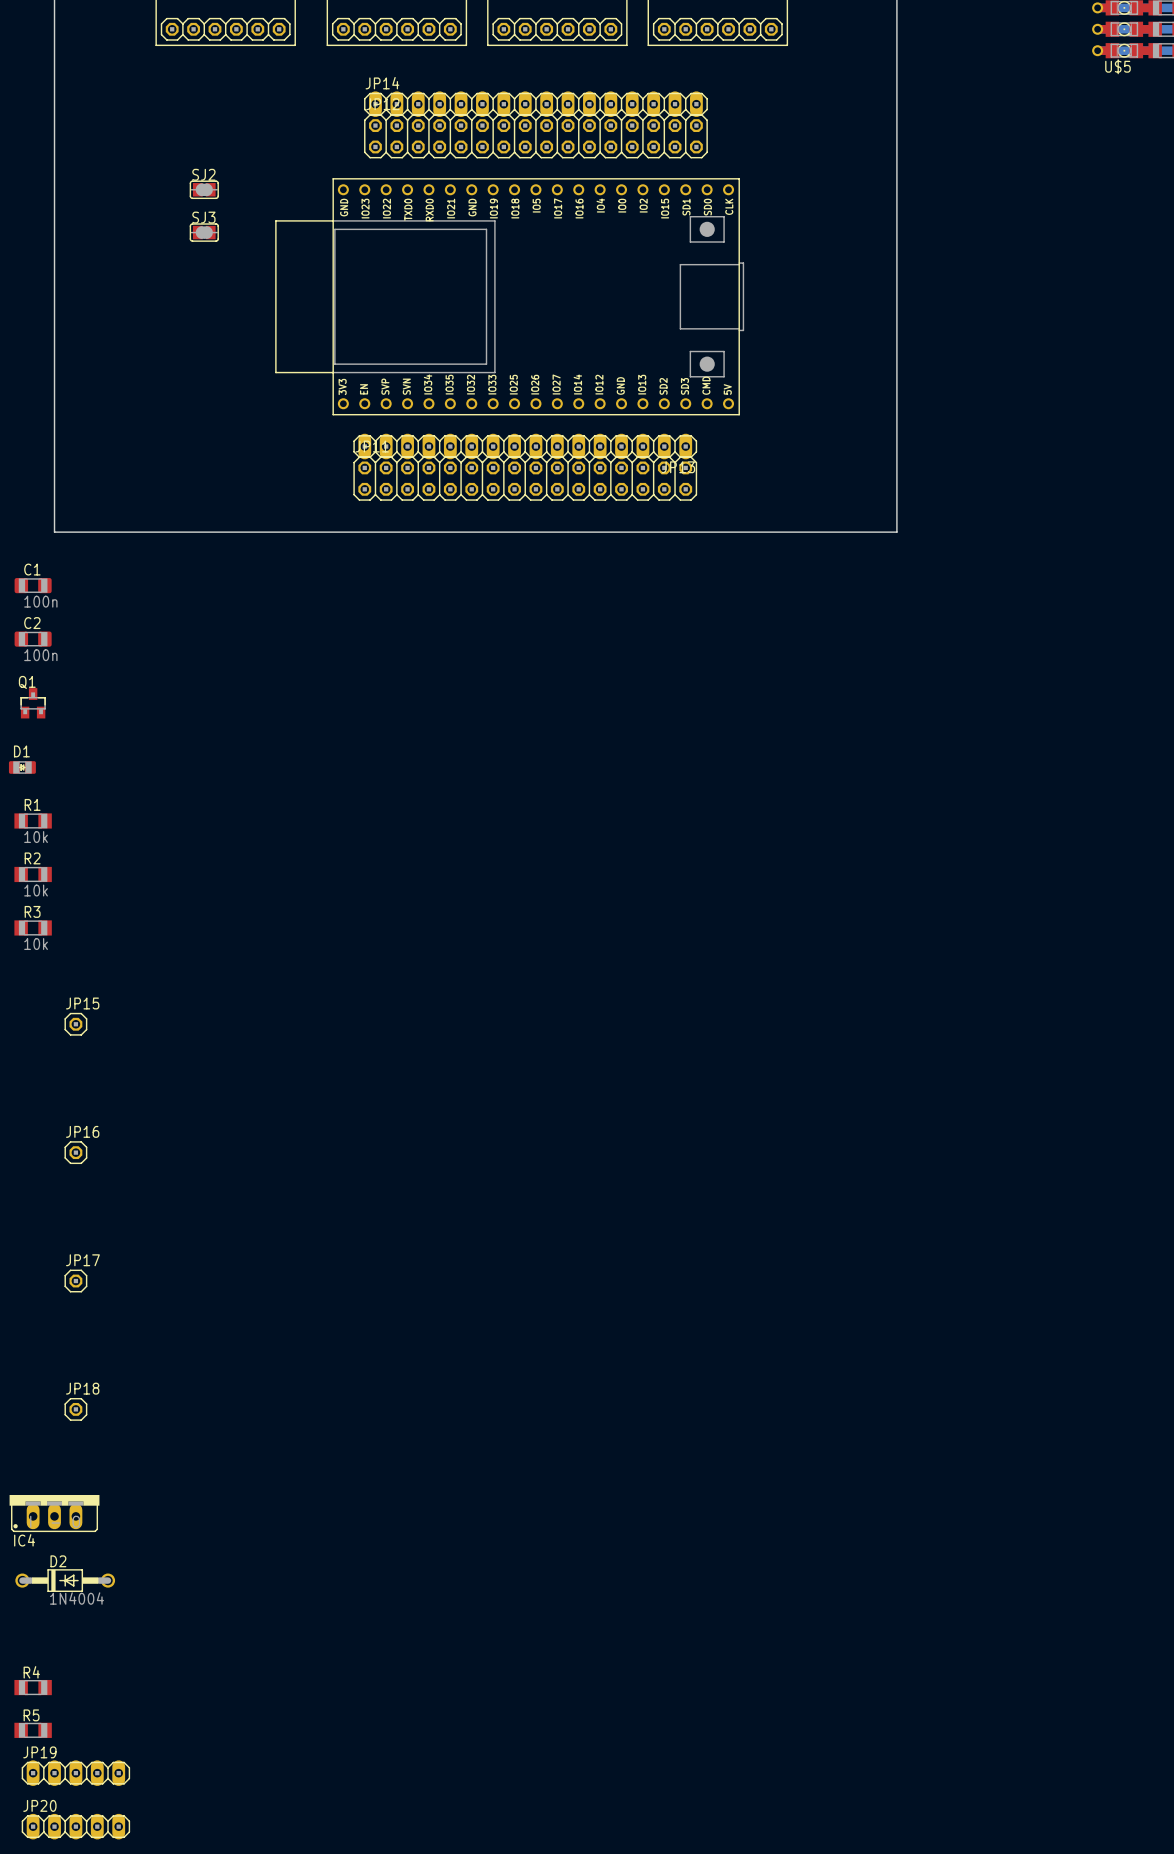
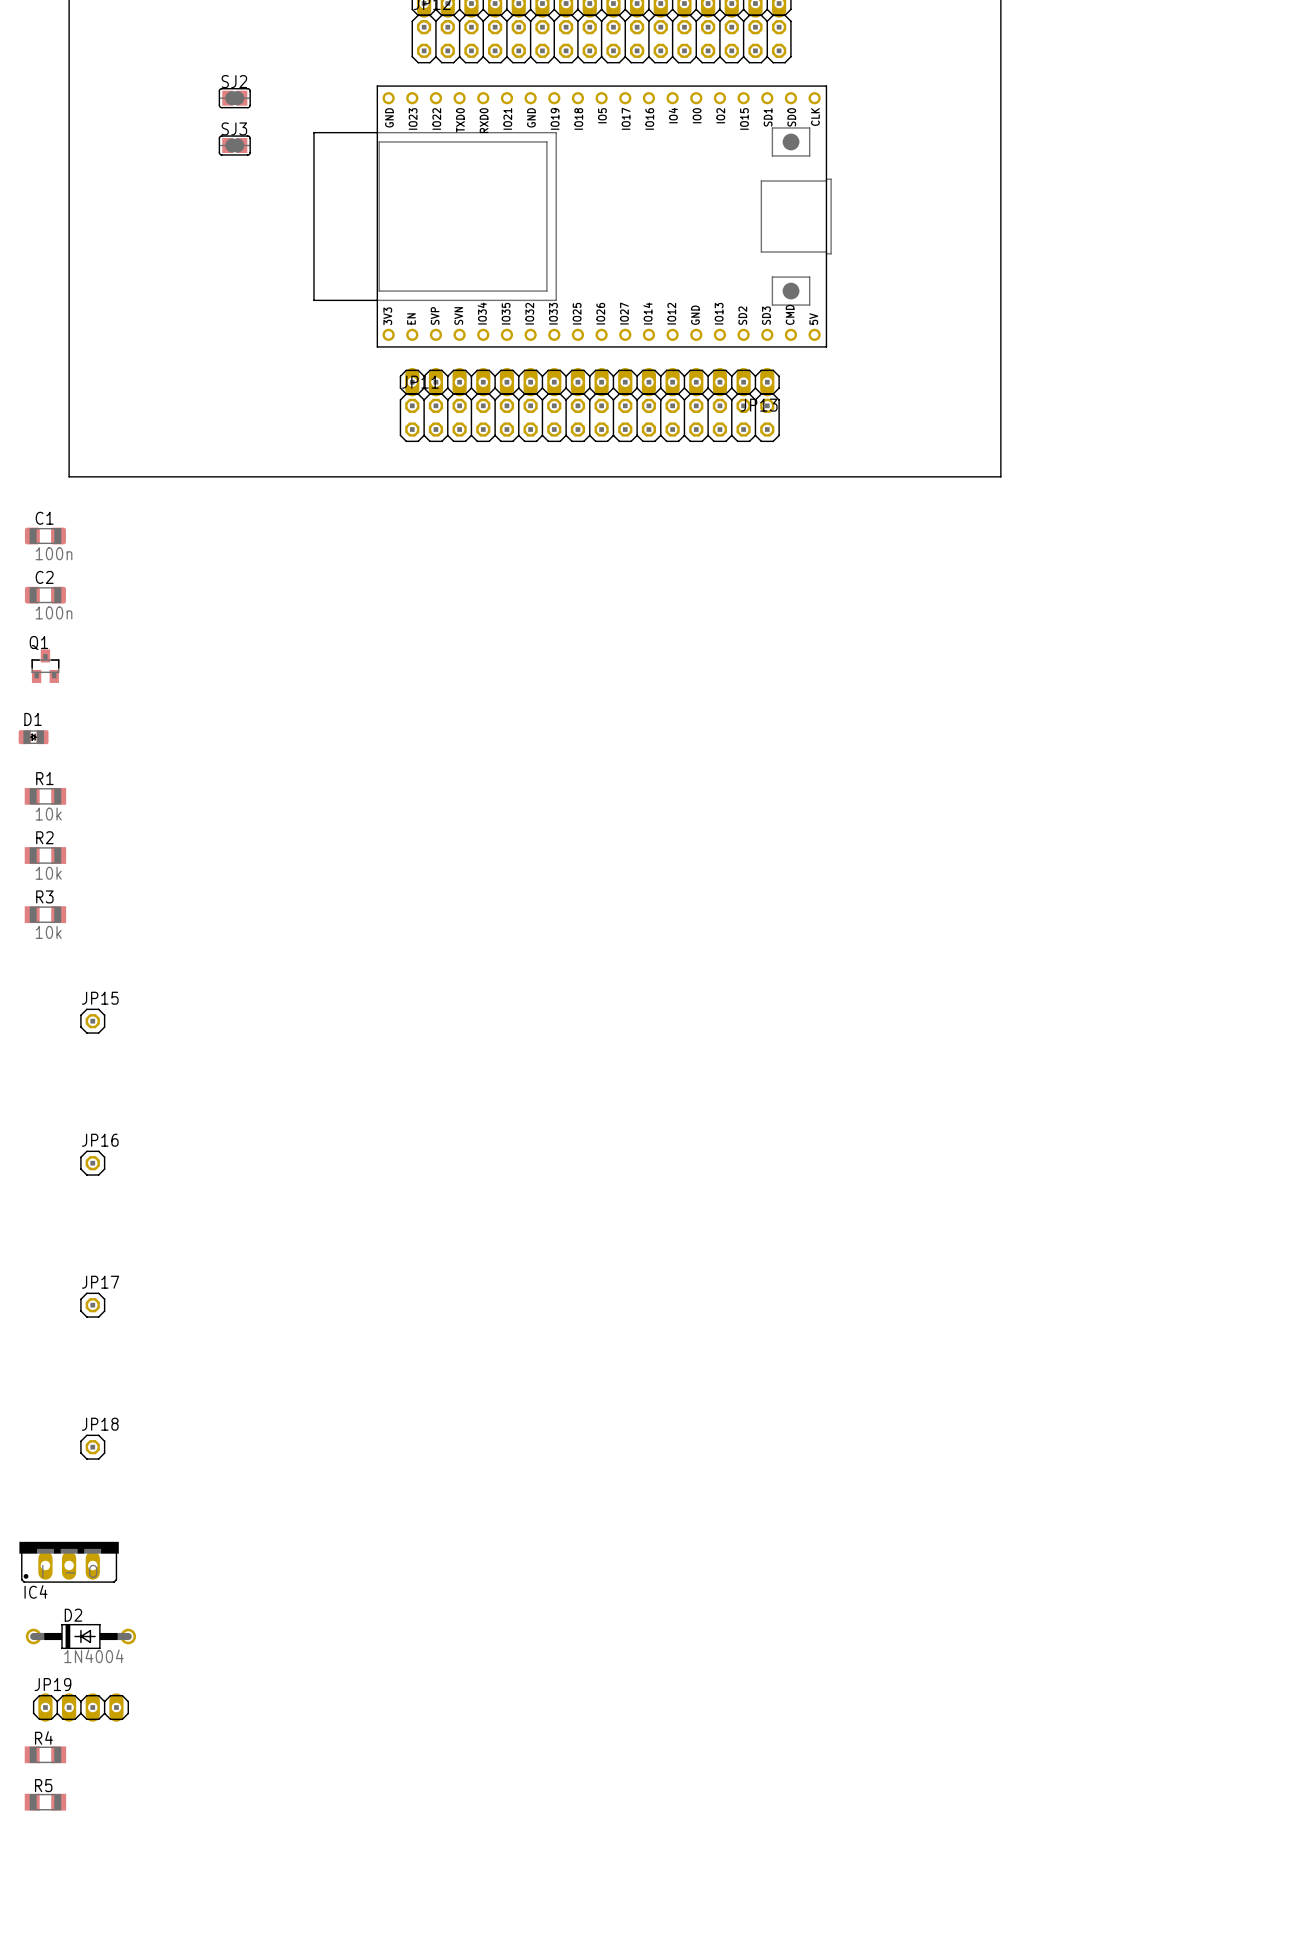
JP19 footprint: [21, 1760, 131, 1786] -> [32, 1693, 129, 1722]
JP20: (75, 1826) -> none

